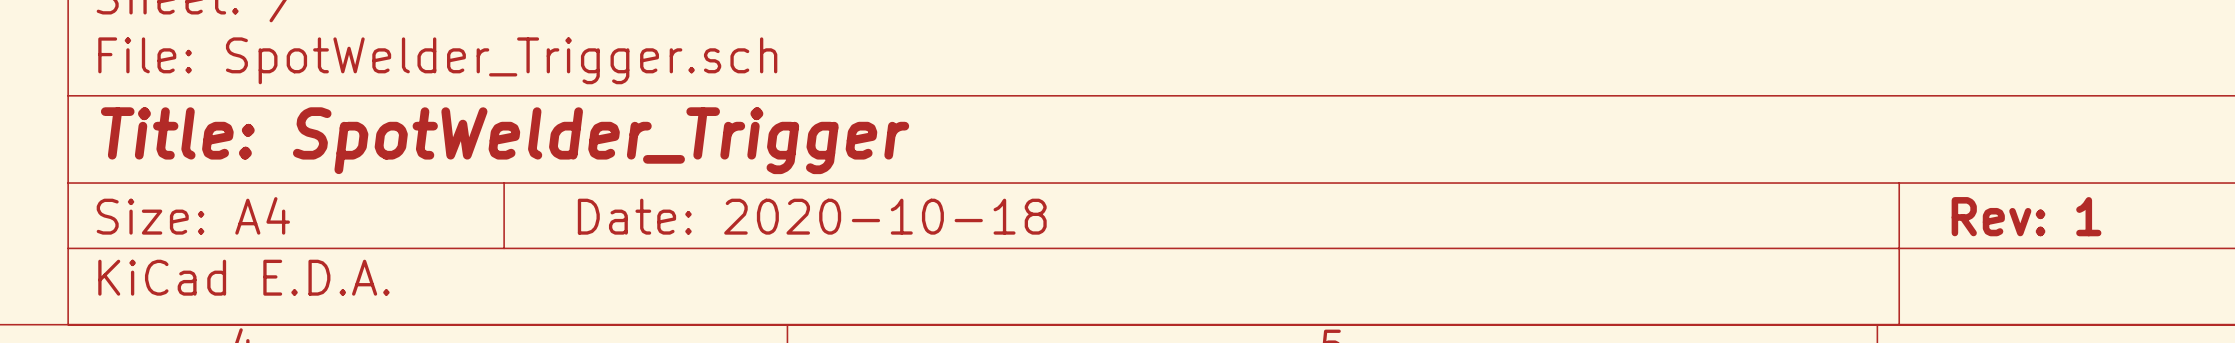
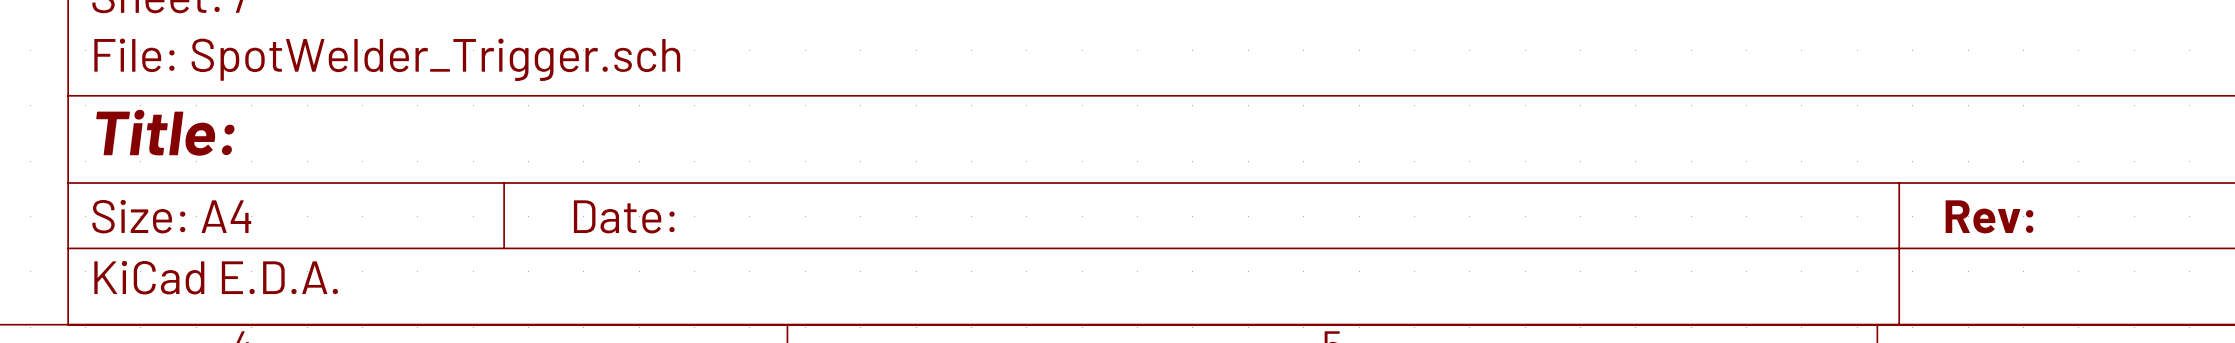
title block: Title: SpotWelder_Trigger (505, 140) -> Title: (165, 132)
title block: Date: 2020-10-18 (812, 216) -> Date: (624, 216)
title block: Rev: 1 (2026, 216) -> Rev: (1989, 216)

